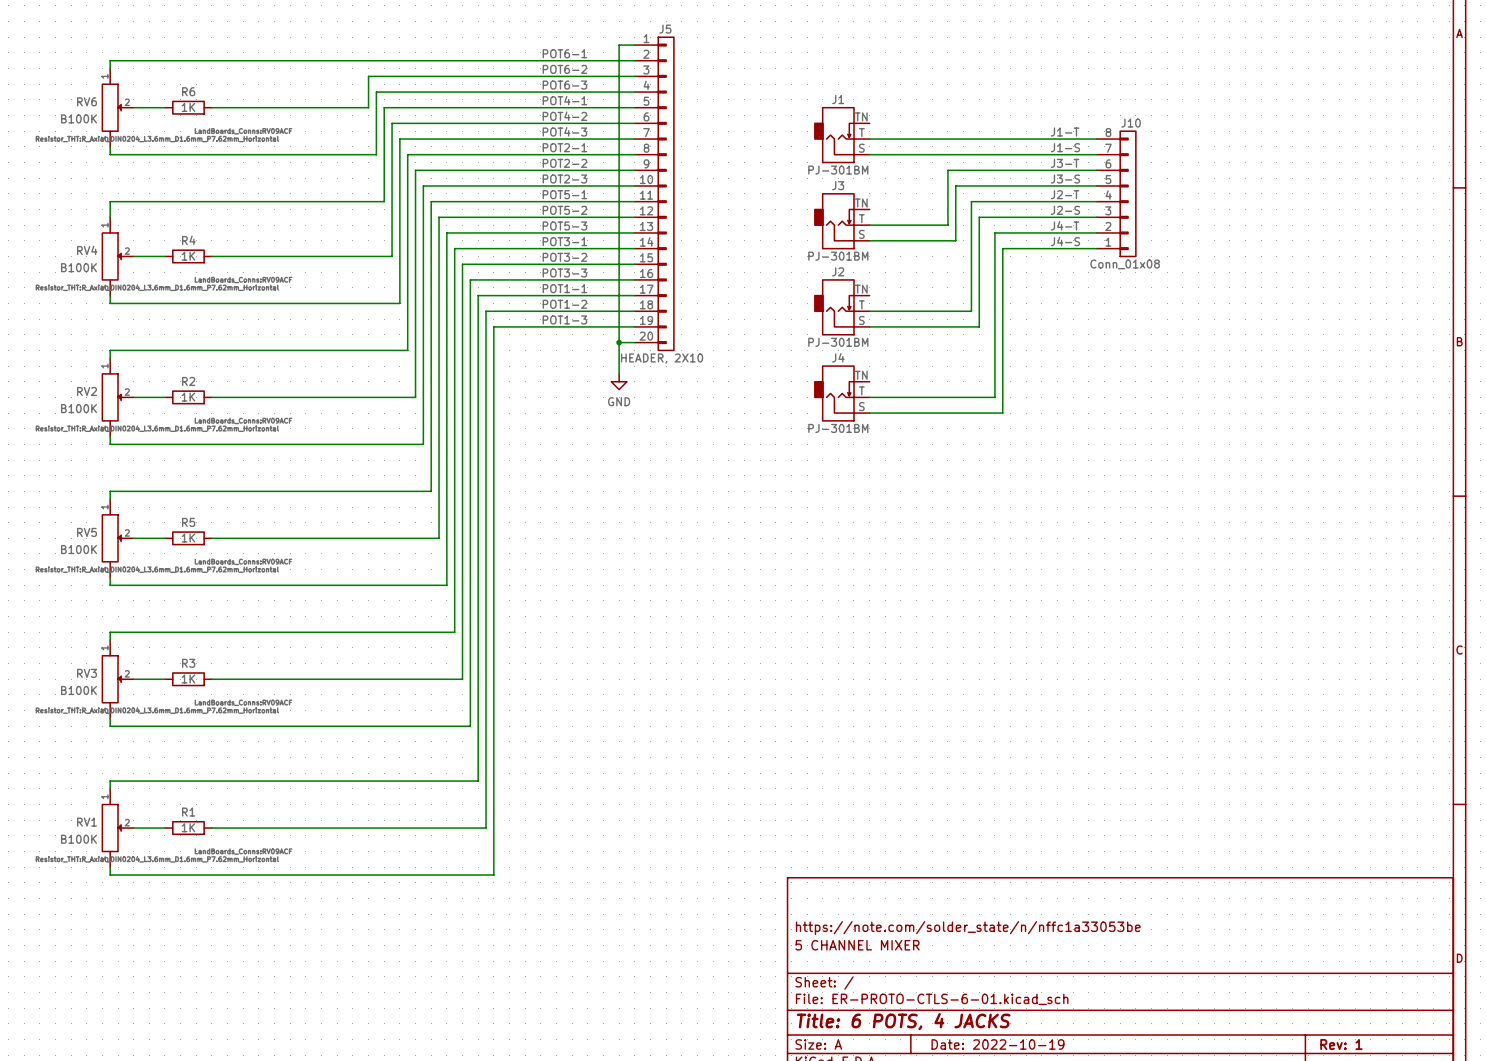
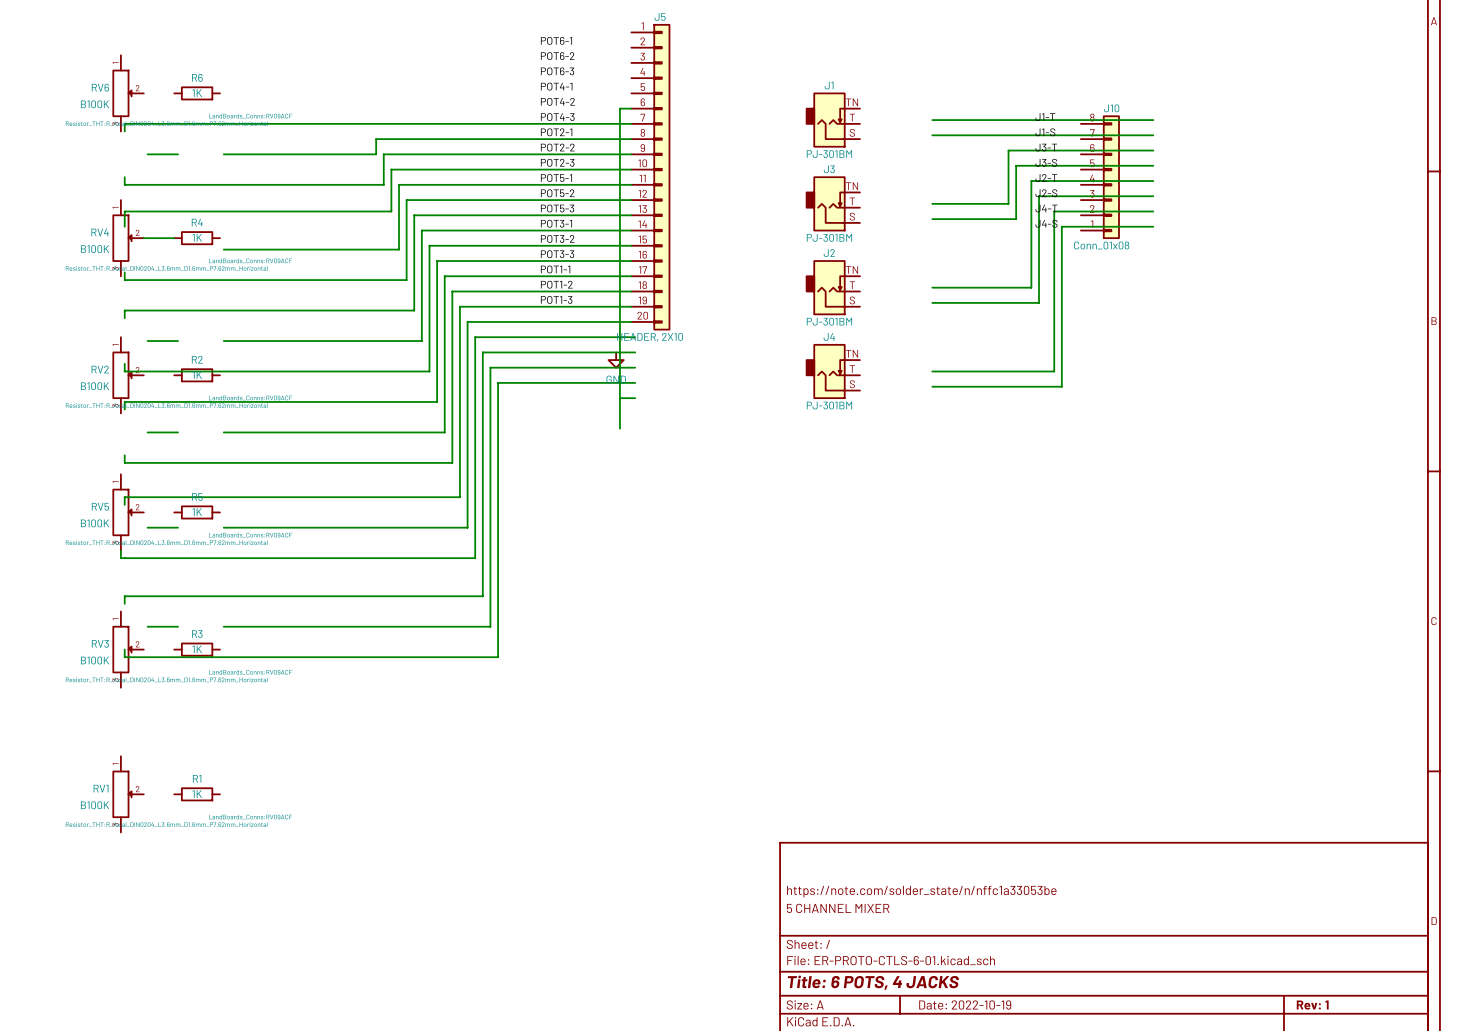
wire: (634, 45) (619, 45) (619, 373) -> none
wire: (634, 60) (110, 60) (110, 68) -> none
wire: (634, 76) (368, 76) (368, 107) (211, 107) -> none
wire: (634, 92) (376, 92) (376, 154) -> (410, 139) (379, 139)
wire: (133, 107) (164, 107) -> (147, 154) (178, 154)
wire: (634, 107) (384, 107) (384, 201) (380, 201) -> (418, 154) (383, 154) (383, 184)
wire: (623, 123) (392, 123) (392, 256) (211, 256) -> (619, 108) (619, 428)
wire: (399, 139) (399, 303) (110, 303) (110, 295) -> (402, 123) (124, 123) (124, 131)
wire: (869, 139) (1096, 139) -> (932, 120) (1153, 120)
wire: (110, 146) (110, 154) (372, 154) -> (223, 154) (376, 154) (376, 139)
wire: (407, 154) (407, 350) (110, 350) (110, 358) -> none
wire: (869, 154) (1096, 154) -> (932, 135) (1153, 135)
wire: (415, 170) (415, 397) (211, 397) -> none
wire: (1096, 170) (947, 170) (947, 225) (869, 225) -> (1153, 150) (1008, 150) (1008, 203) (932, 203)
wire: (423, 185) (423, 444) (110, 444) (110, 436) -> (425, 169) (391, 169) (391, 211) (124, 211) (124, 226)
wire: (1096, 185) (955, 185) (955, 240) (869, 240) -> (1153, 165) (1016, 165) (1016, 219) (932, 219)
wire: (114, 201) (110, 201) (110, 217) -> (124, 184) (124, 177)
wire: (431, 201) (431, 491) (110, 491) (110, 499) -> (433, 184) (399, 184) (399, 249) (223, 249)
wire: (1096, 201) (971, 201) (971, 311) (869, 311) -> (1153, 181) (1031, 181) (1031, 287) (932, 287)
wire: (439, 217) (439, 538) (211, 538) -> (440, 200) (406, 200) (406, 280) (124, 280) (124, 272)
wire: (1096, 217) (979, 217) (979, 326) (869, 326) -> (1153, 196) (1039, 196) (1039, 302) (932, 302)
wire: (446, 232) (446, 585) -> (635, 337) (475, 337) (475, 558) (448, 558)
wire: none -> (448, 215) (414, 215) (414, 310) (124, 310) (124, 318)
wire: (1096, 232) (994, 232) (994, 397) (869, 397) -> (1153, 211) (1054, 211) (1054, 371) (932, 371)
wire: (454, 248) (454, 632) (110, 632) (110, 640) -> (456, 230) (421, 230) (421, 341) (223, 341)
wire: (1096, 248) (1002, 248) (1002, 413) (869, 413) -> (1153, 226) (1061, 226) (1061, 386) (932, 386)
wire: (462, 264) (462, 679) (211, 679) -> (463, 245) (429, 245) (429, 371) (124, 371) (124, 363)
wire: (470, 279) (470, 726) (110, 726) (110, 718) -> (471, 261) (437, 261) (437, 401) (124, 401) (124, 409)
wire: (478, 295) (478, 781) (110, 781) (110, 788) -> (479, 276) (444, 276) (444, 432) (223, 432)
wire: (486, 311) (486, 828) (211, 828) -> (486, 291) (452, 291) (452, 462) (124, 462) (124, 455)
wire: (493, 326) (493, 875) (110, 875) (110, 867) -> (494, 306) (459, 306) (459, 497) (124, 497) (124, 504)
wire: none -> (616, 321) (467, 321) (467, 527) (223, 527)
junction: (619, 342) -> none
wire: none -> (635, 352) (482, 352) (482, 596) (124, 596) (124, 603)
wire: none -> (635, 367) (490, 367) (490, 626) (223, 626)
wire: (133, 397) (164, 397) -> (147, 341) (178, 341)
wire: none -> (635, 382) (498, 382) (498, 657) (124, 657) (124, 649)
wire: none -> (619, 398) (635, 398)
wire: none -> (147, 432) (178, 432)
wire: (133, 538) (164, 538) -> (147, 527) (178, 527)
wire: (133, 679) (164, 679) -> (147, 626) (178, 626)
wire: (133, 828) (164, 828) -> none

